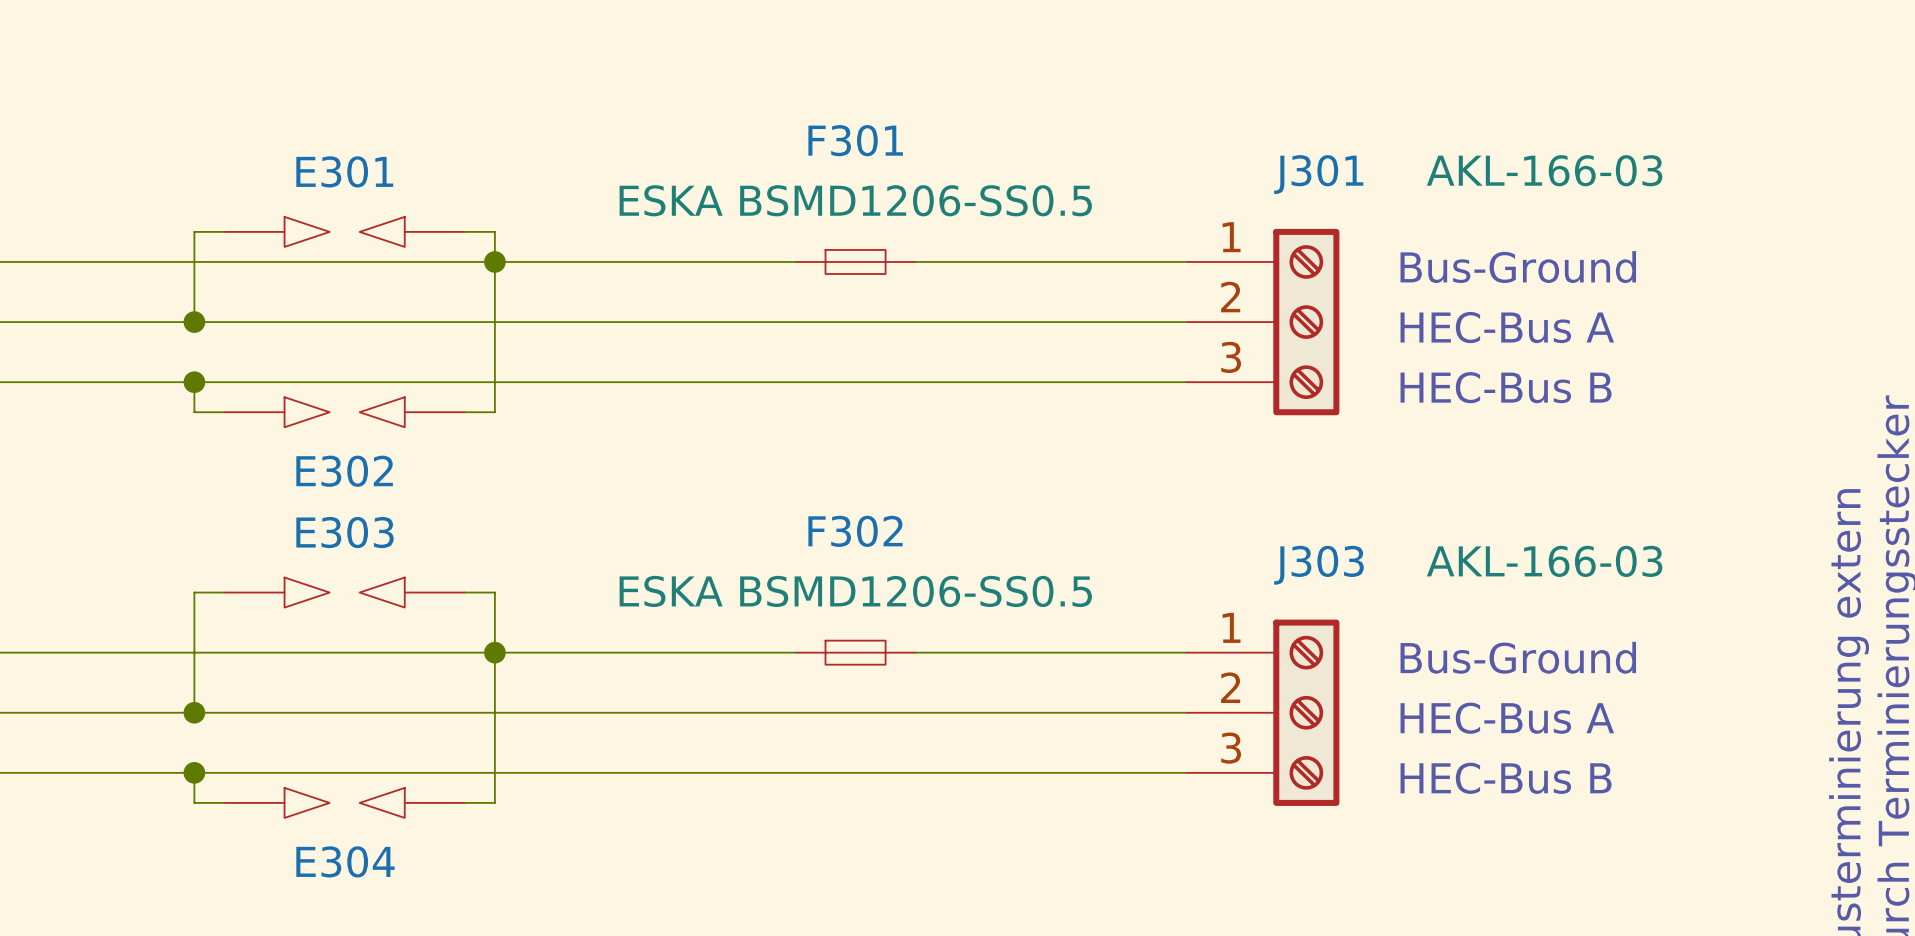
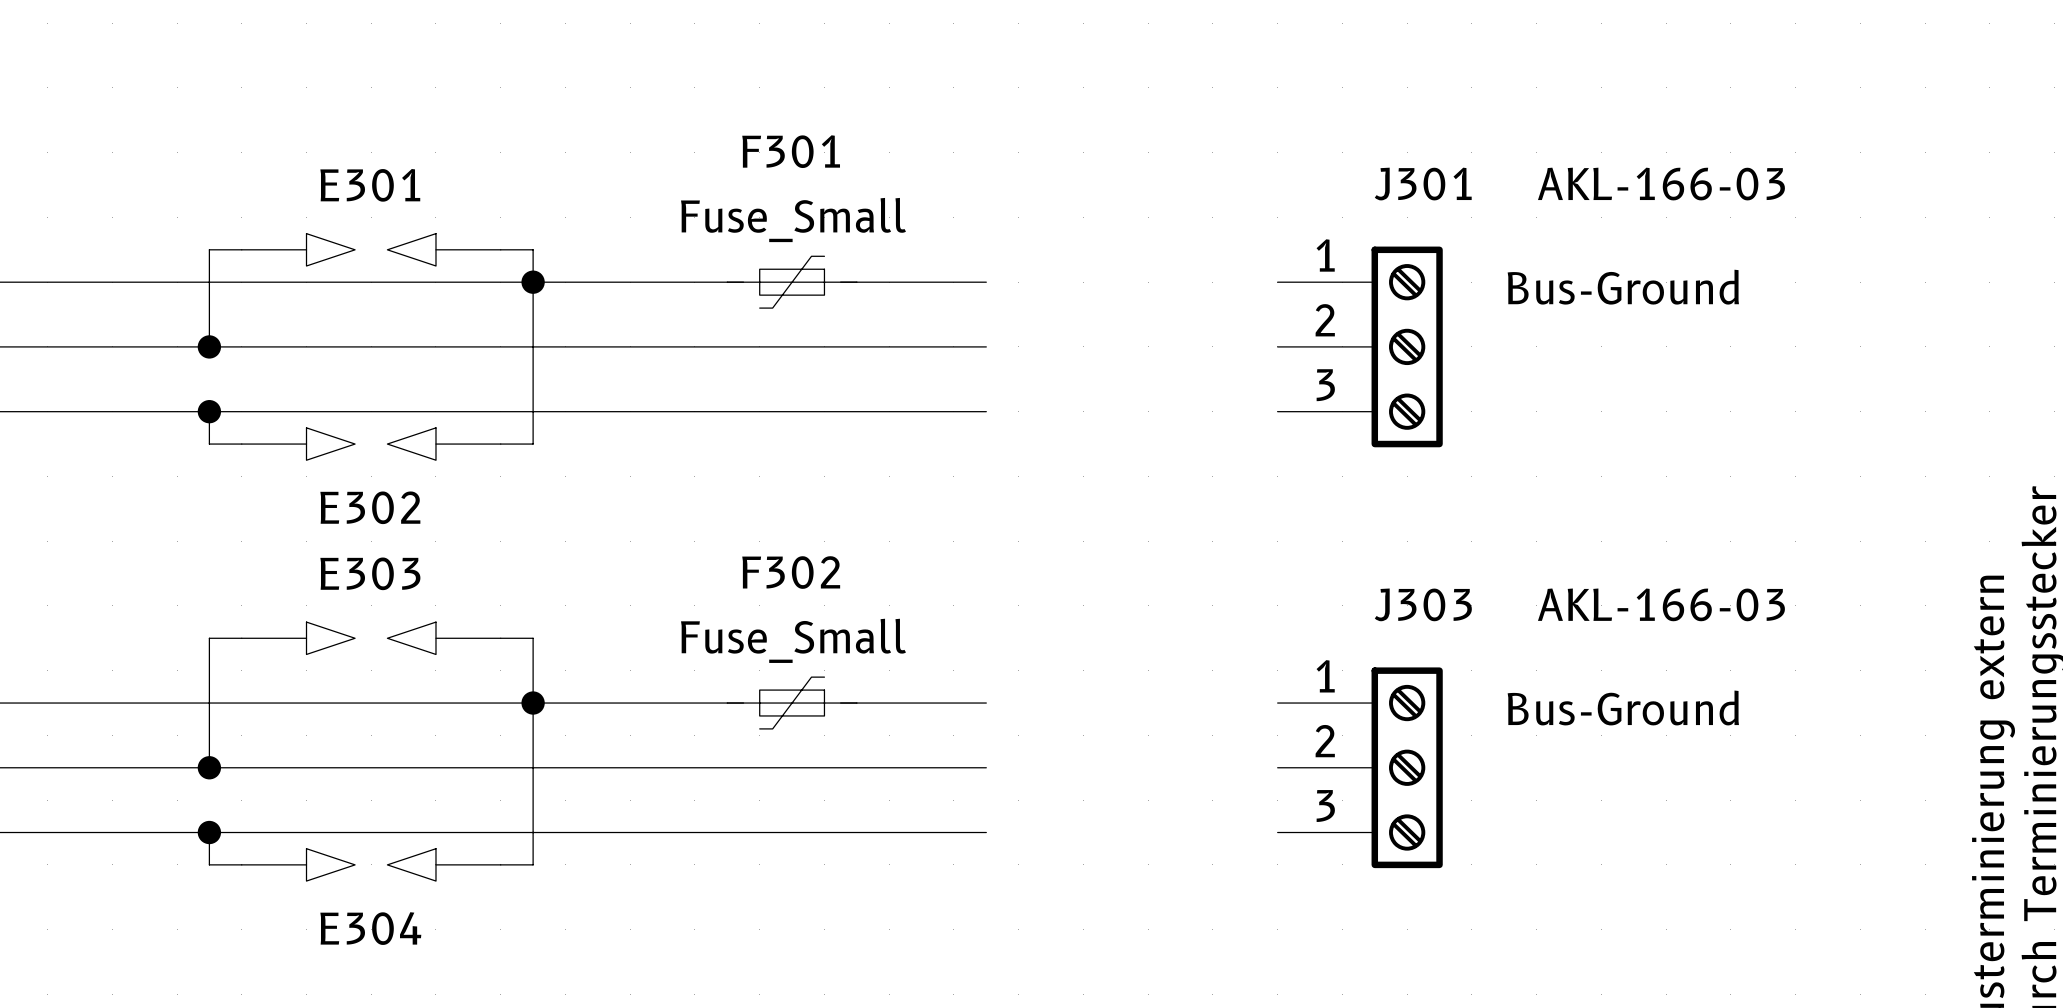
F301 value: ESKA BSMD1206-SS0.5 (855, 200) -> Fuse_Small (793, 220)
F301 symbol: [795, 249, 916, 274] -> [727, 256, 857, 309]
wire: (915, 261) (1186, 261) -> none
wire: (915, 322) (1186, 322) -> none
text: HEC-Bus A (1507, 327) -> none
wire: (915, 382) (1186, 382) -> none
text: HEC-Bus B (1506, 387) -> none
F302 value: ESKA BSMD1206-SS0.5 (855, 591) -> Fuse_Small (793, 640)
F302 symbol: [795, 640, 916, 665] -> [727, 677, 857, 729]
wire: (915, 652) (1186, 652) -> none
wire: (915, 712) (1186, 712) -> none
text: HEC-Bus A (1507, 718) -> none
wire: (915, 772) (1186, 772) -> none
text: HEC-Bus B (1506, 778) -> none

